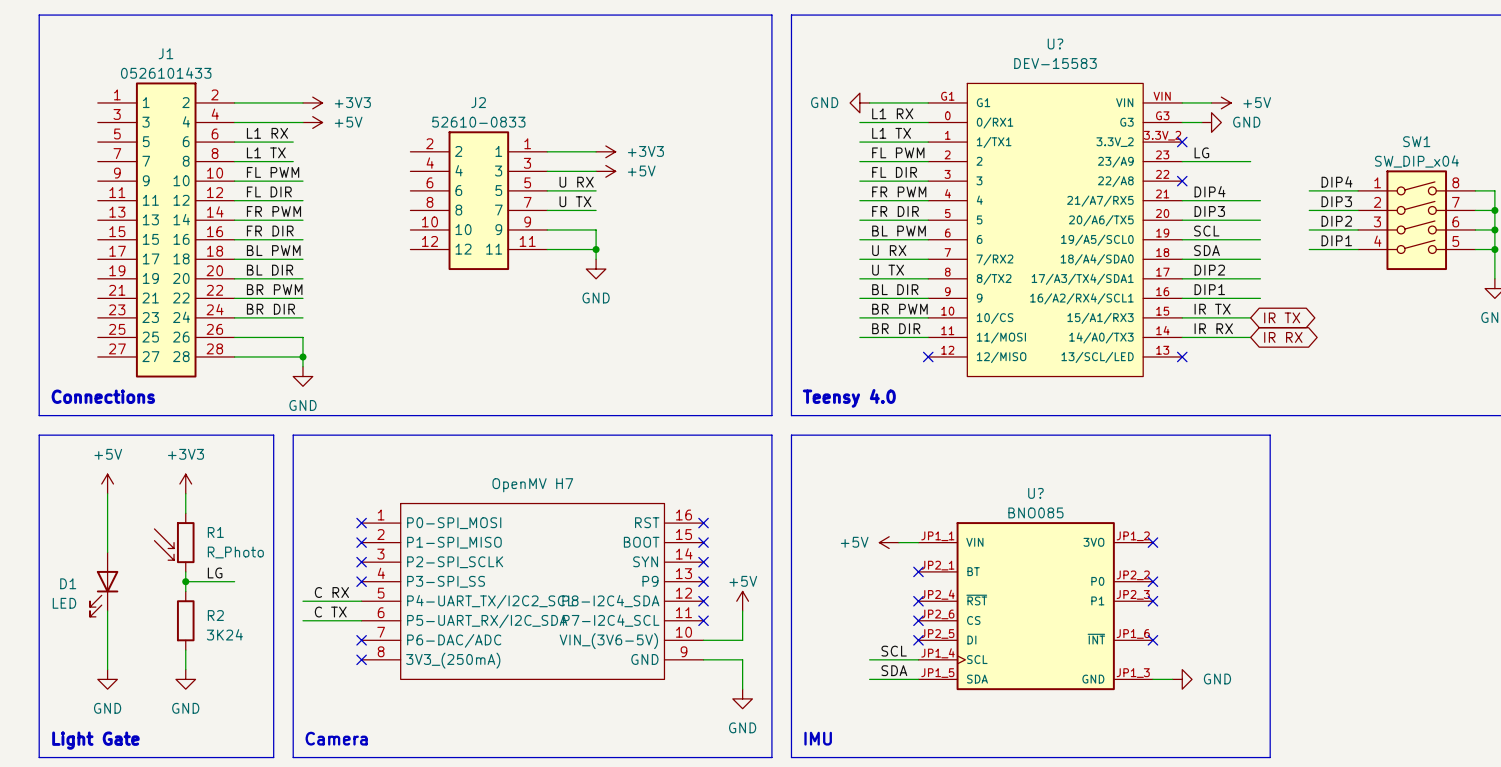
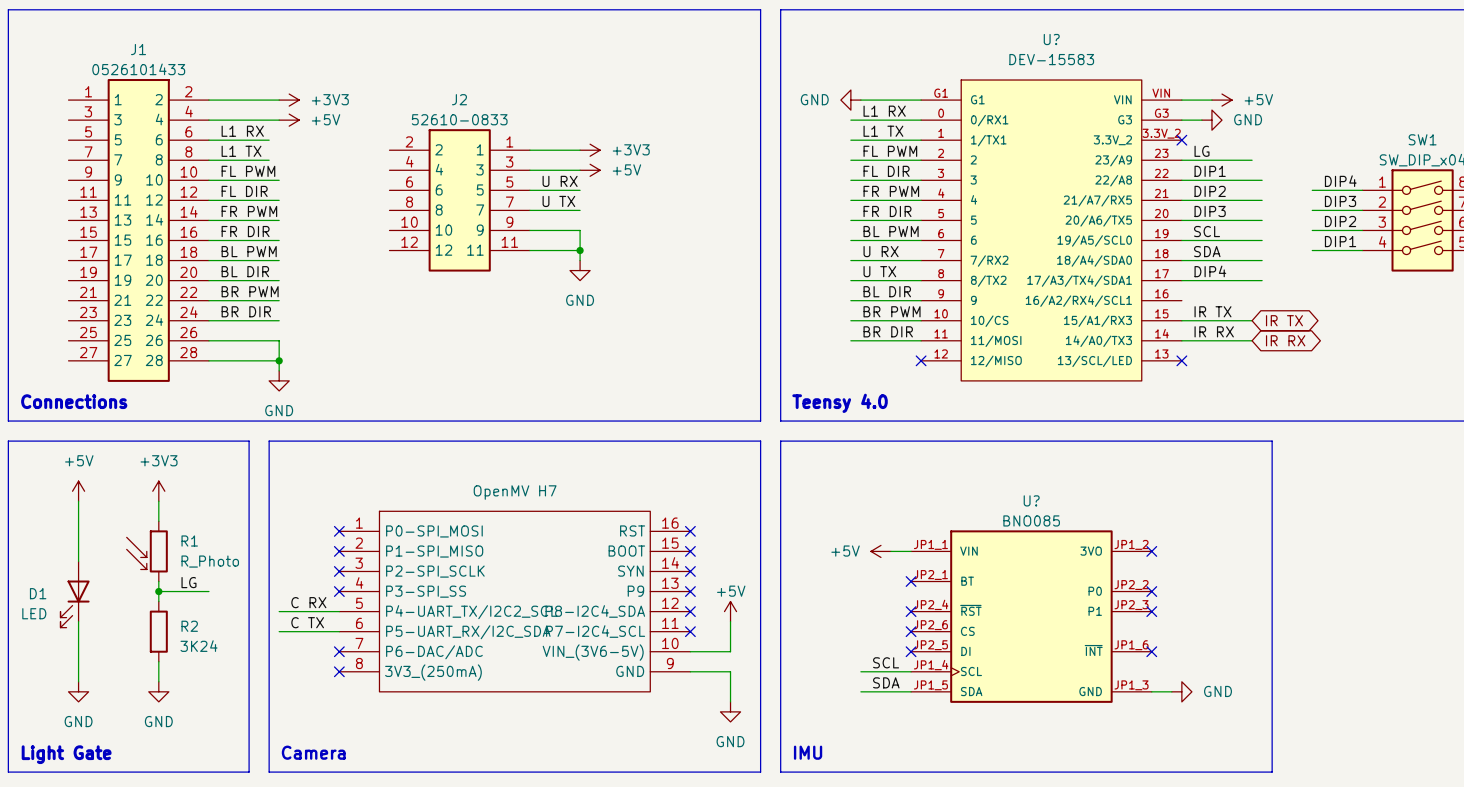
no-connect mark: (1182, 181) -> none
label: DIP4 (1210, 191) -> DIP2 (1210, 191)
label: DIP2 (1209, 270) -> DIP4 (1210, 271)
label position: DIP1 (1209, 289) -> DIP1 (1210, 171)
wire: (1182, 298) (1260, 298) -> (1181, 180) (1262, 180)

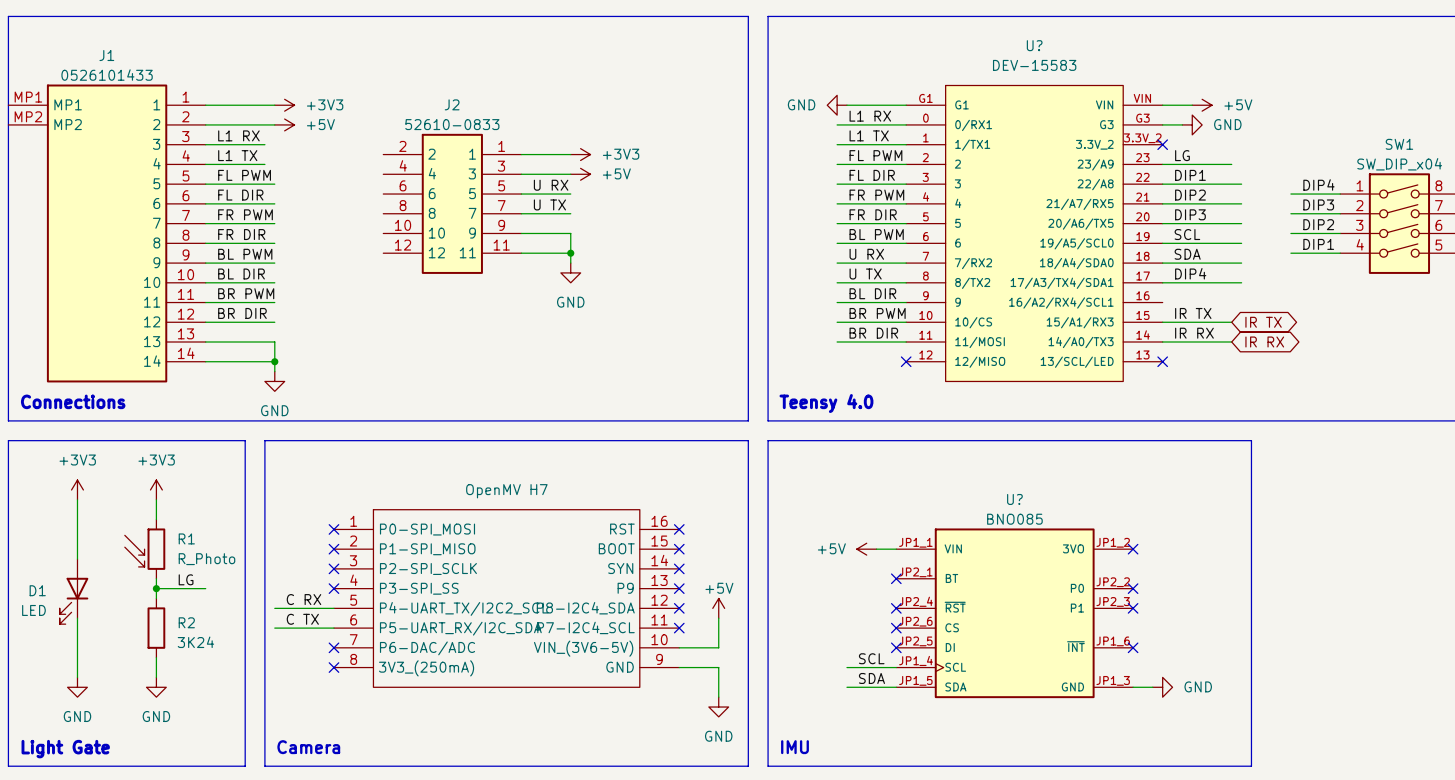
J1 symbol: [68, 79, 209, 382] -> [8, 84, 206, 383]
power symbol: +5V (78, 491) -> +3V3 (77, 489)

